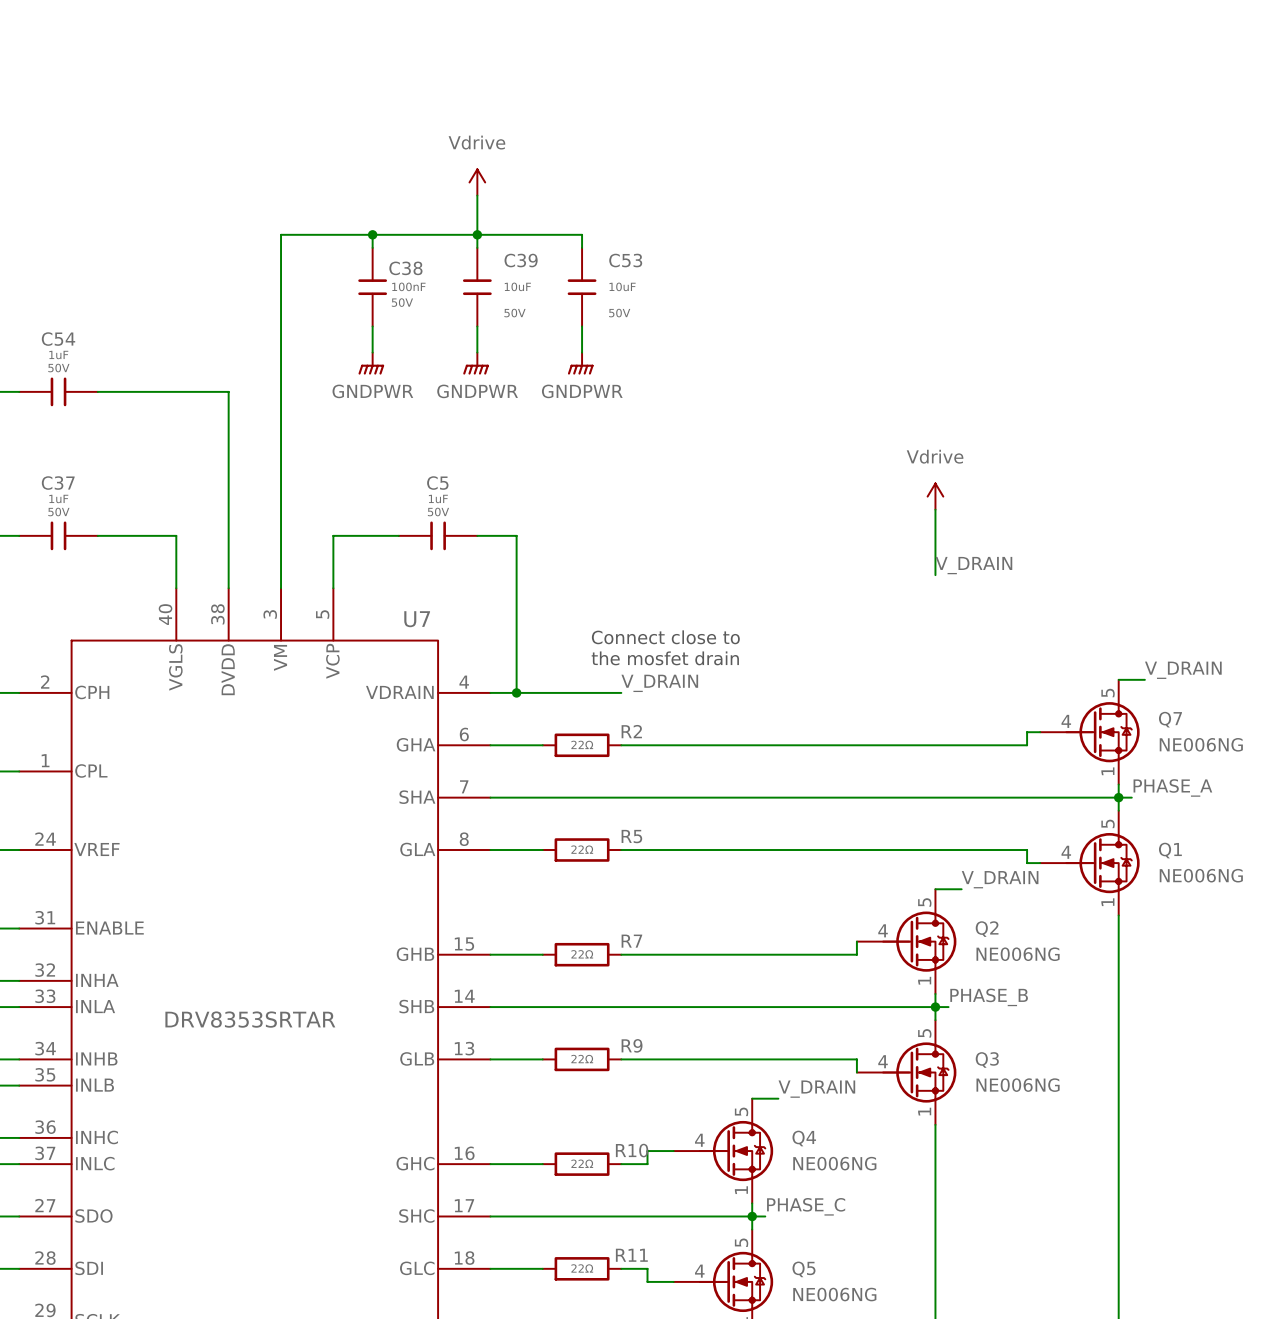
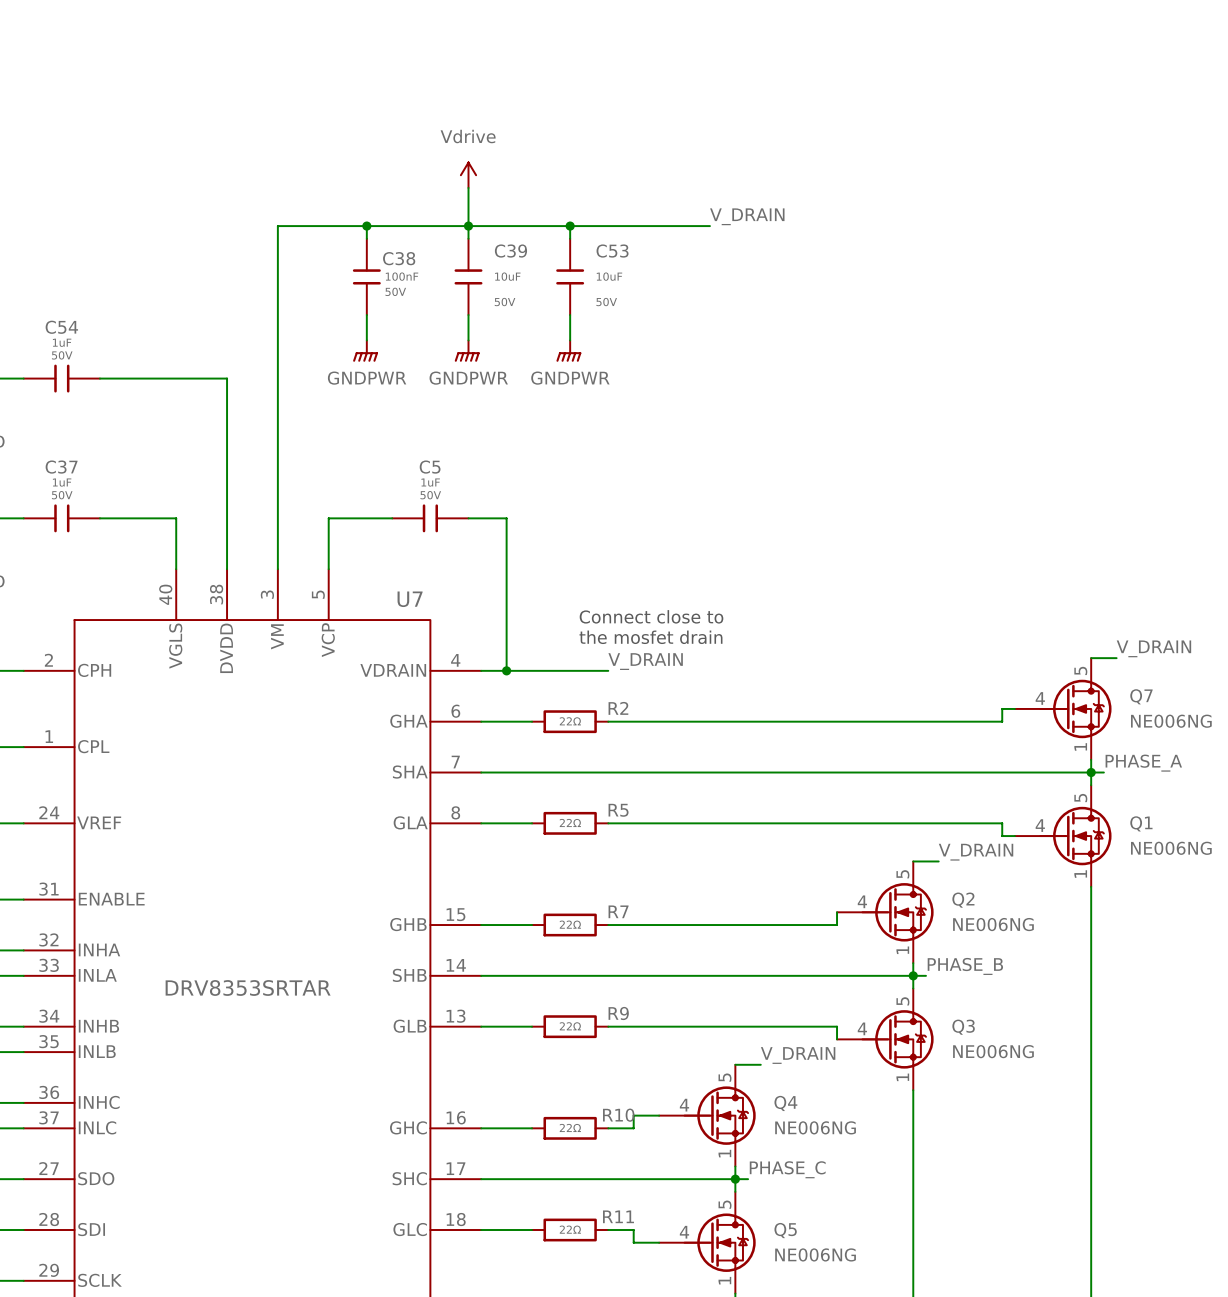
label: none -> V_DRAIN (747, 216)
wire: none -> (570, 226) (709, 226)
junction: none -> (570, 226)
power symbol: Vdrive (935, 496) -> none
wire: (935, 509) (935, 575) -> none
label: V_DRAIN (973, 565) -> none

